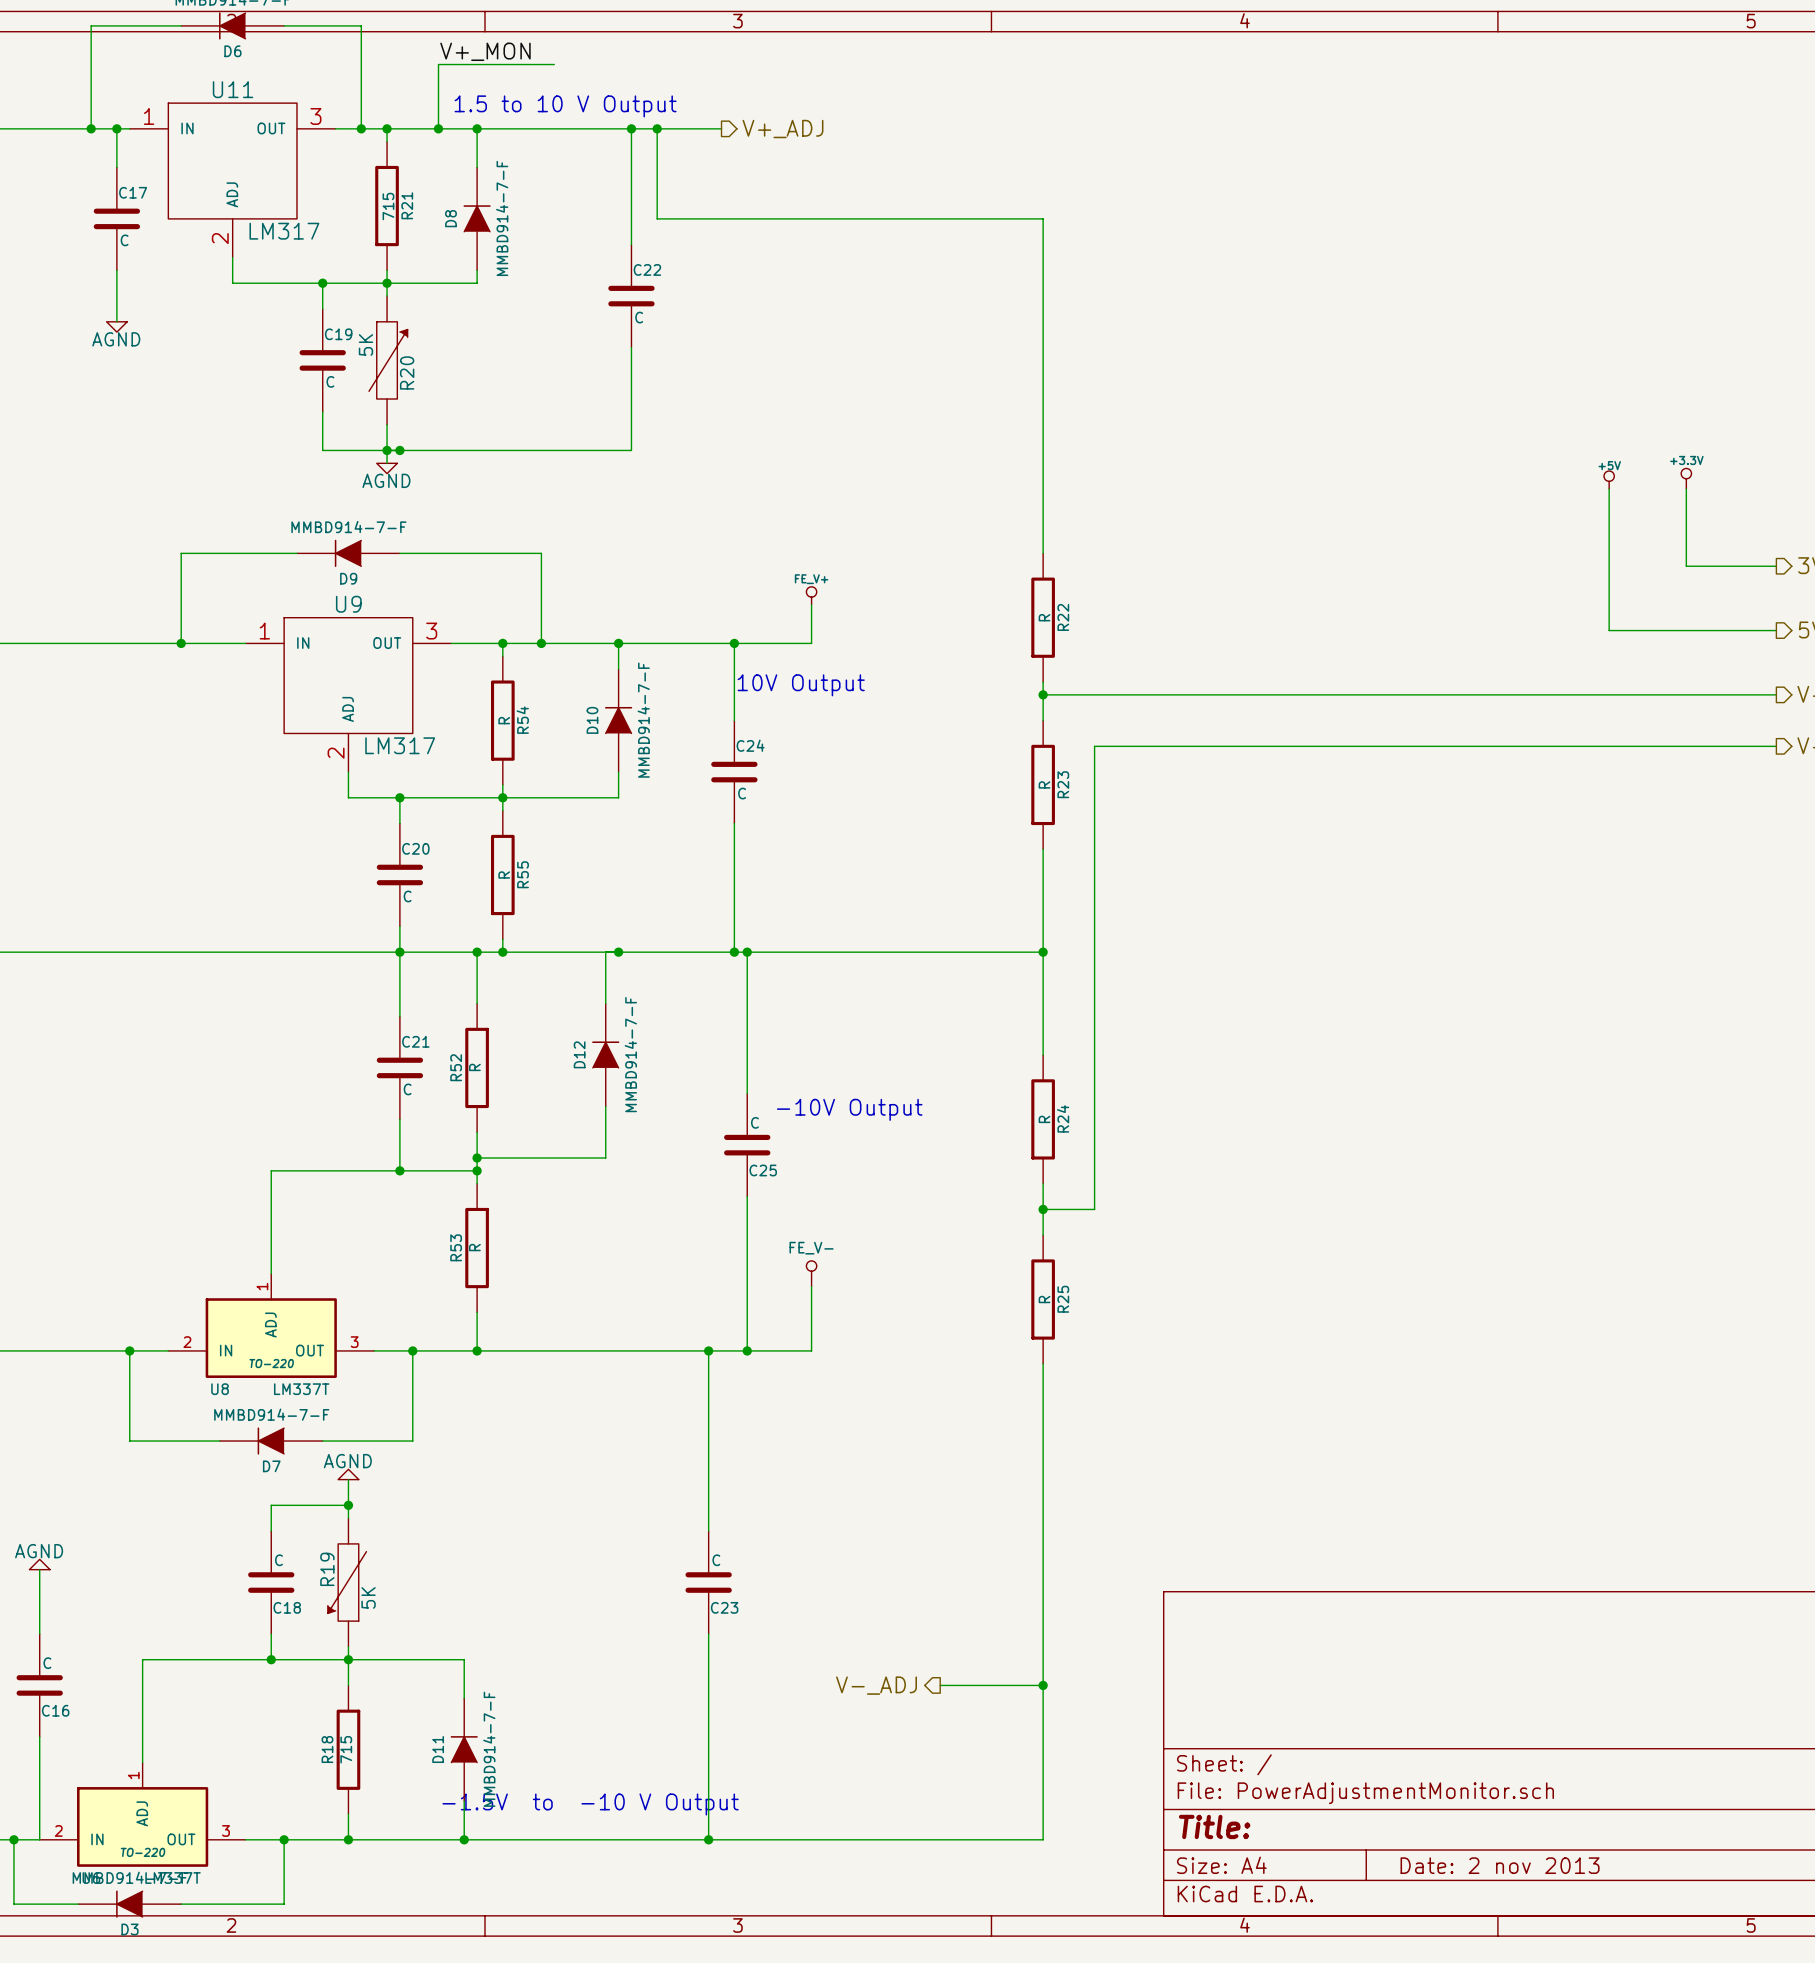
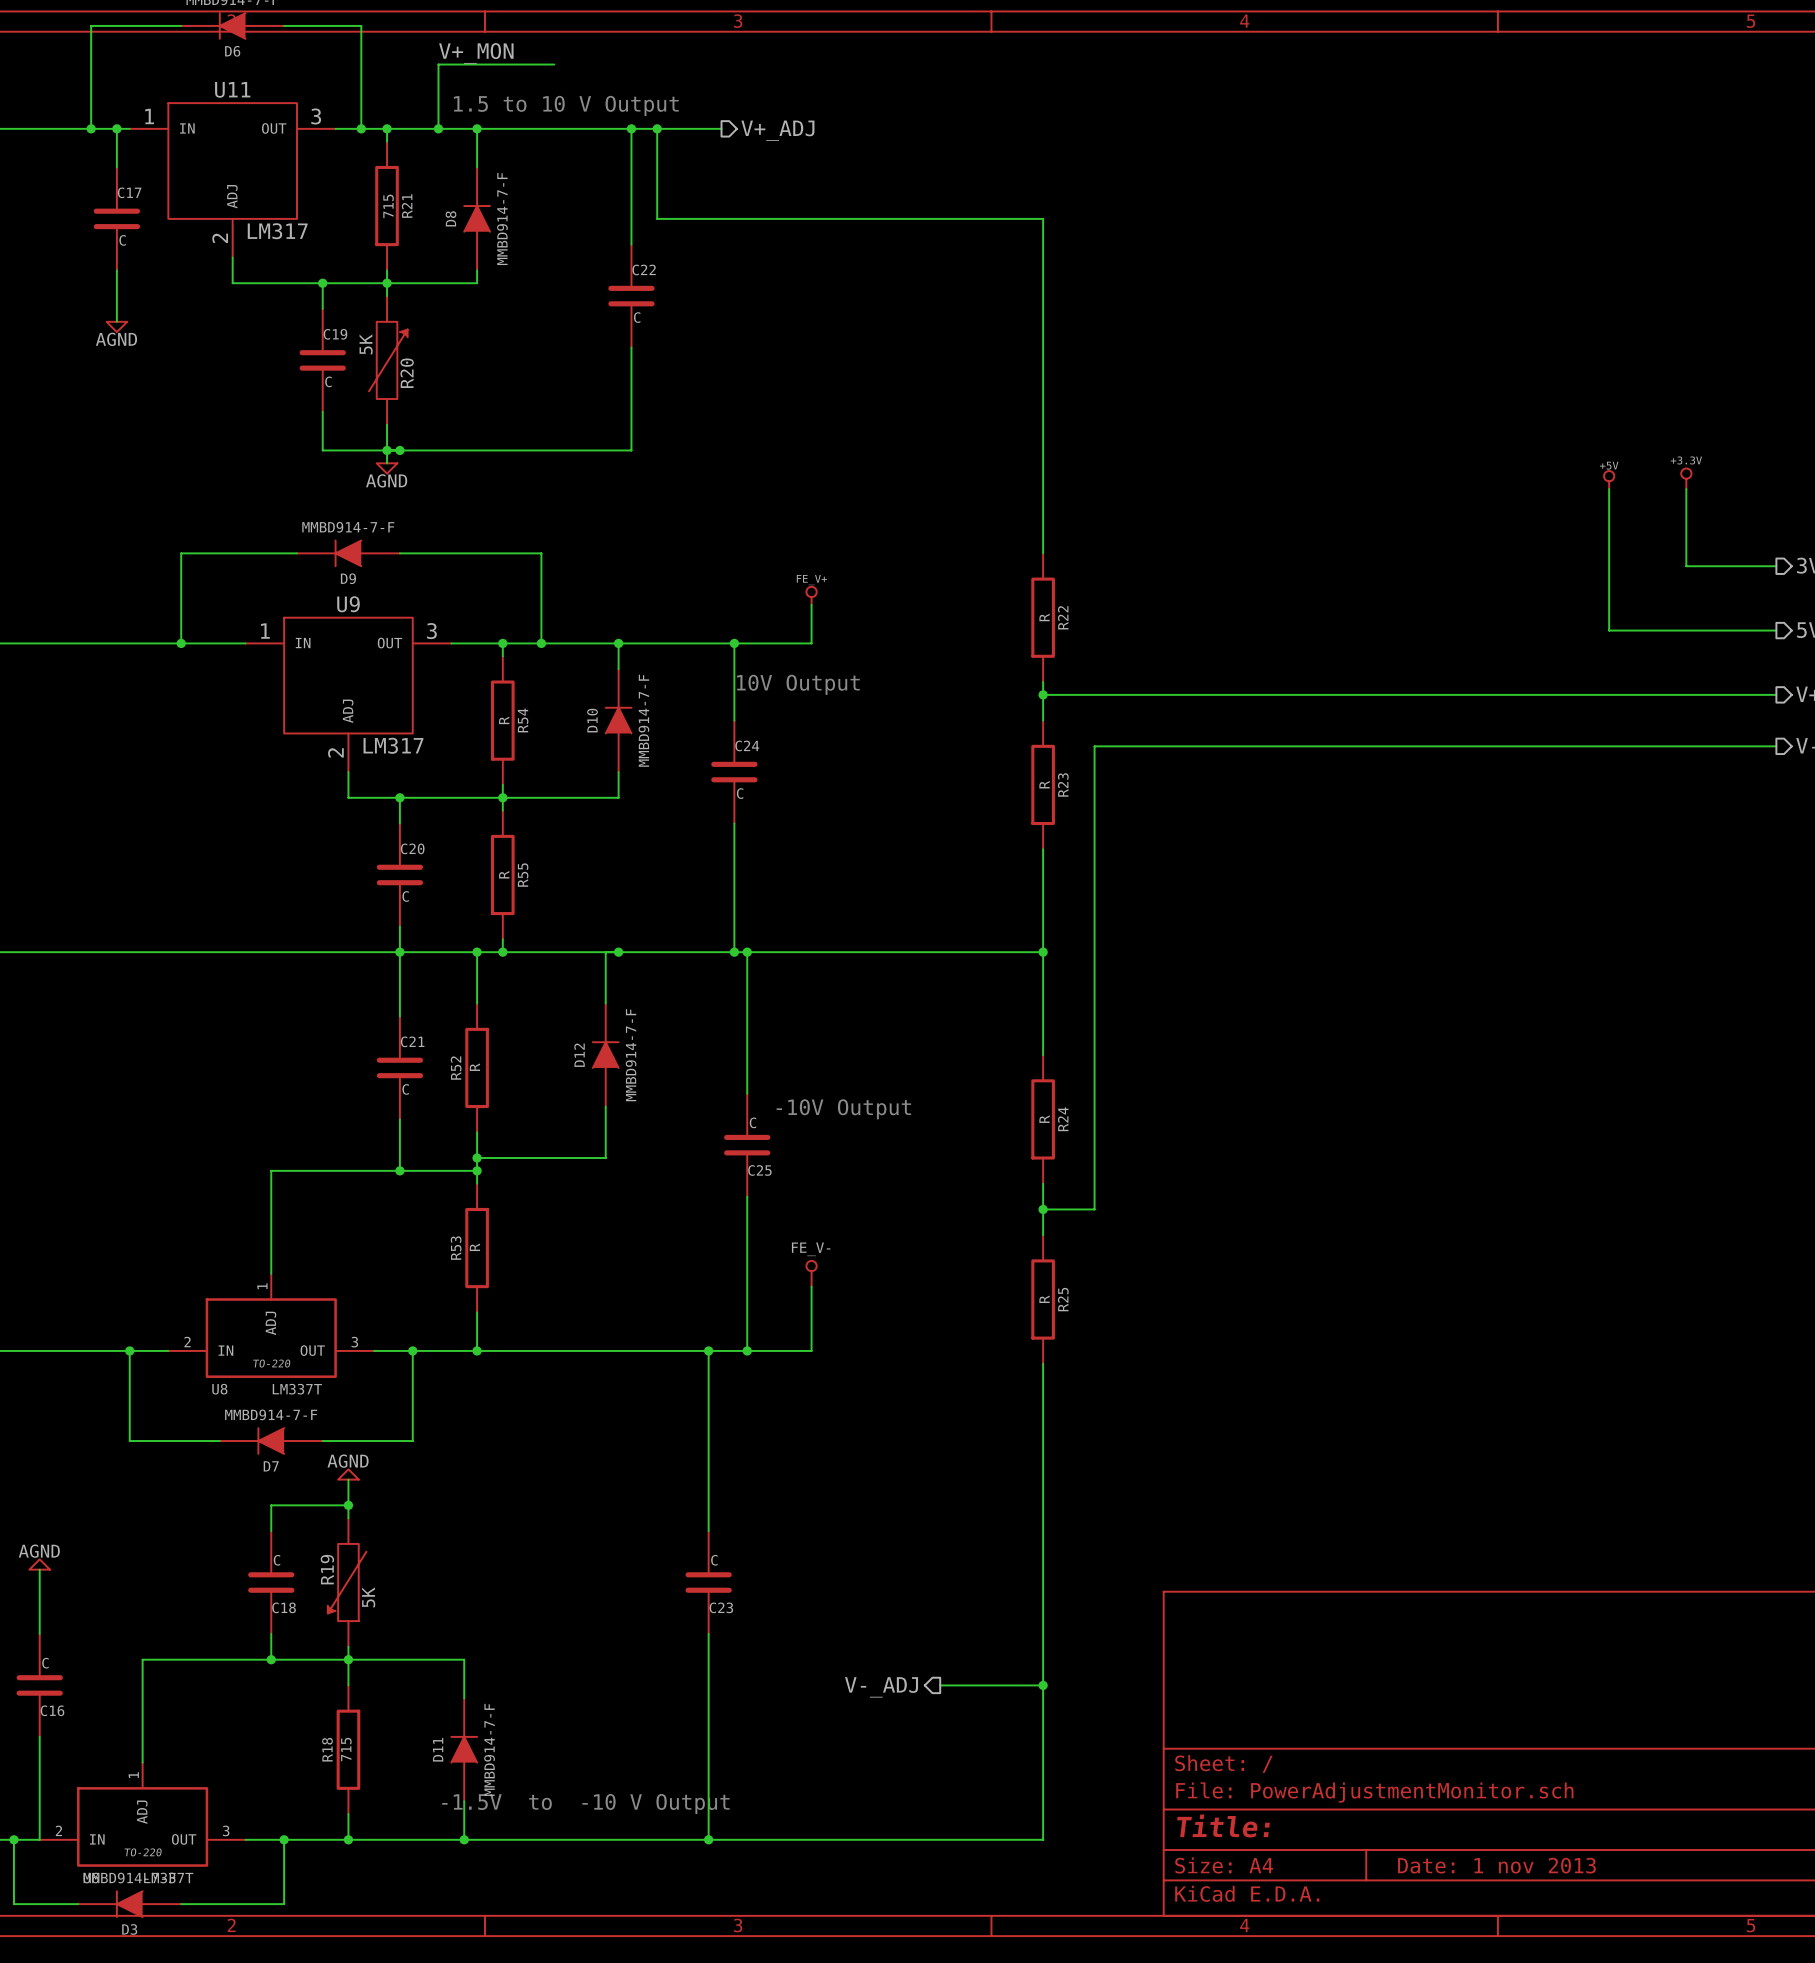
title block: Date: 2 nov 2013 (1500, 1865) -> Date: 1 nov 2013 (1496, 1865)

